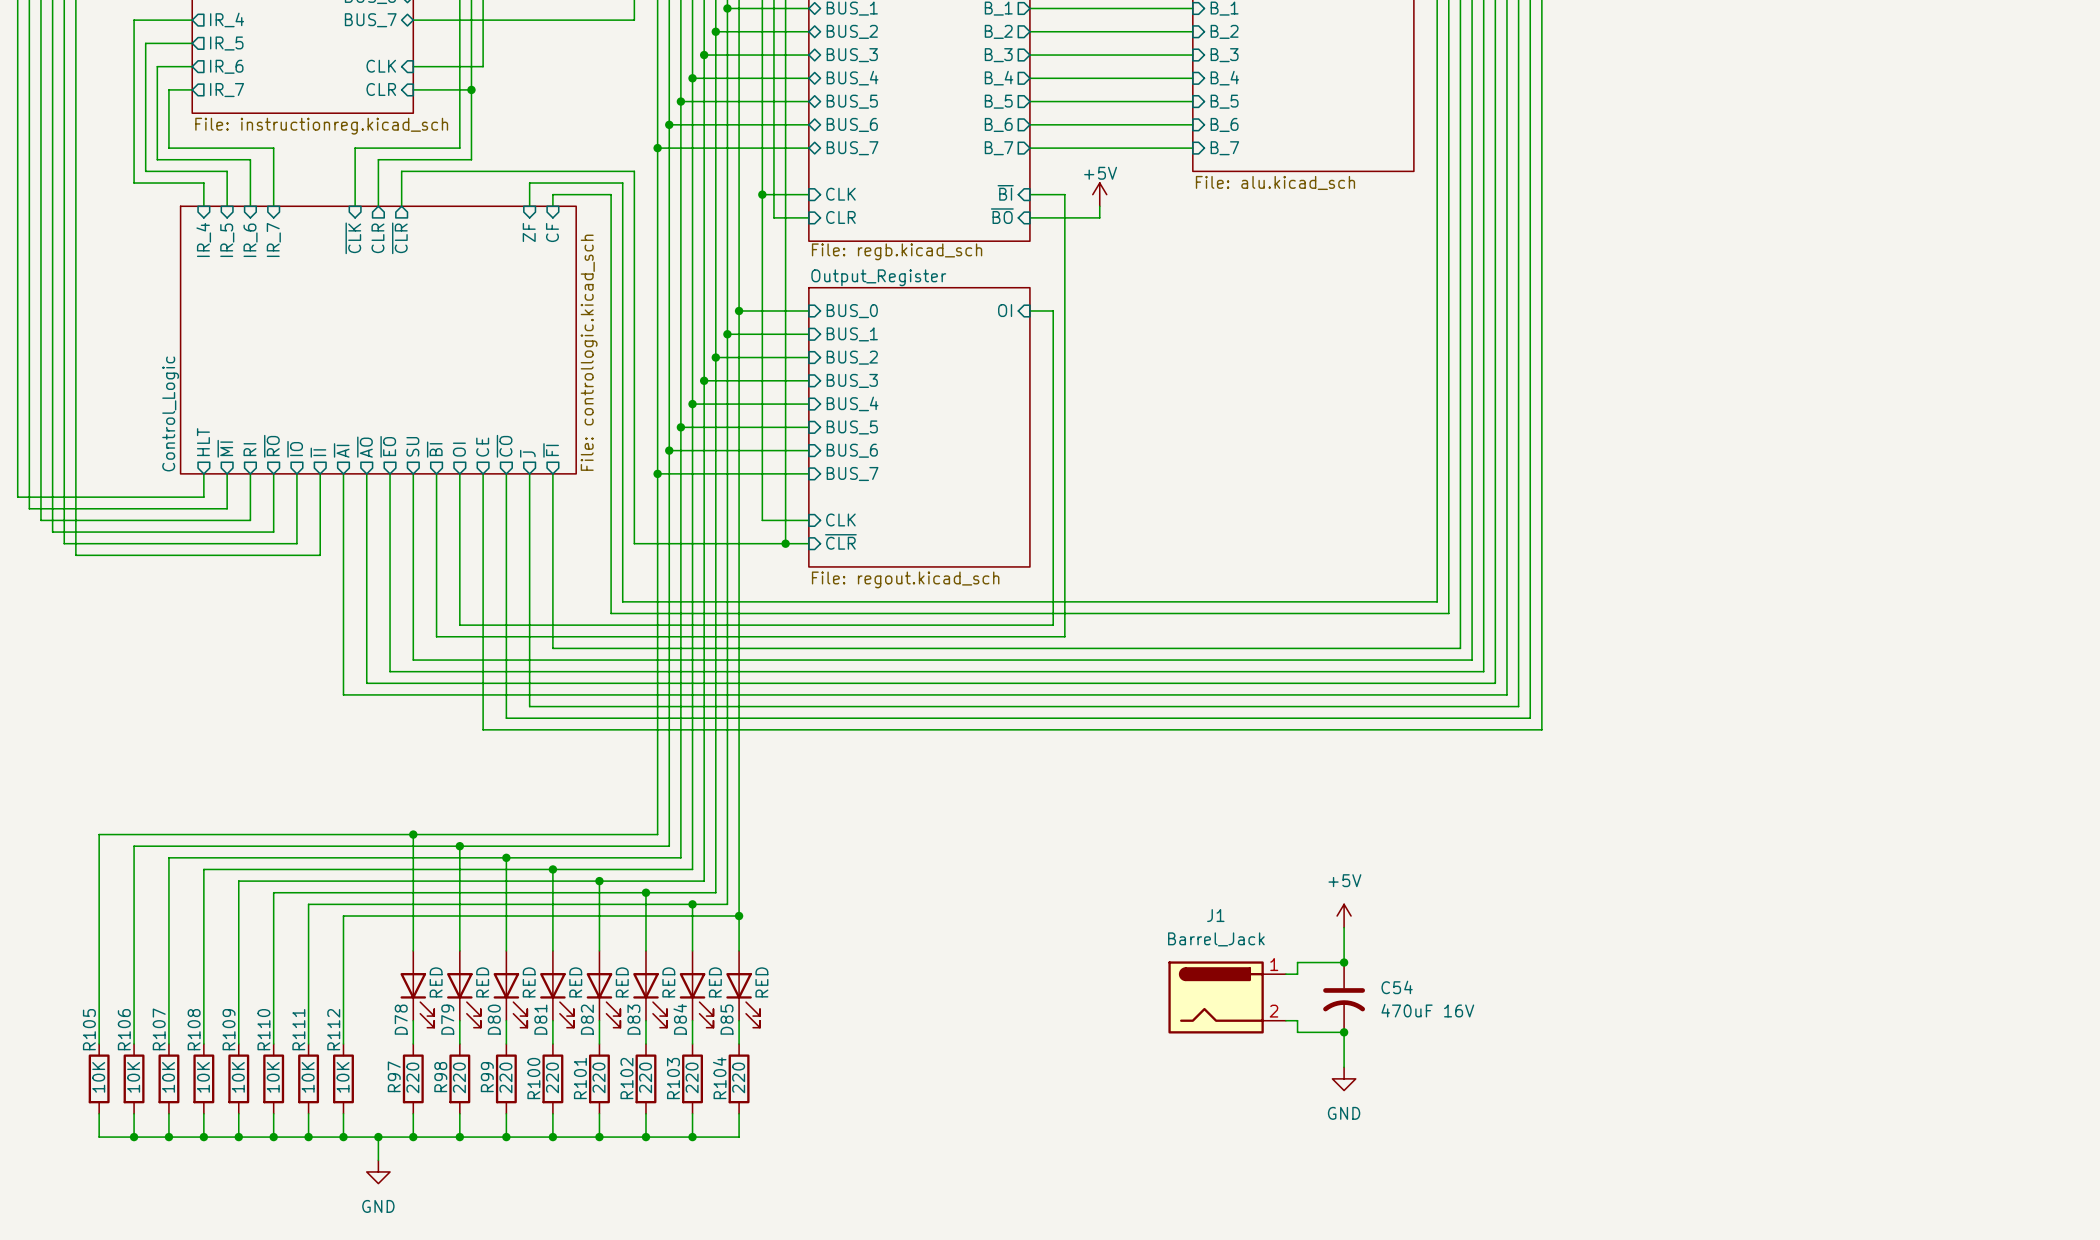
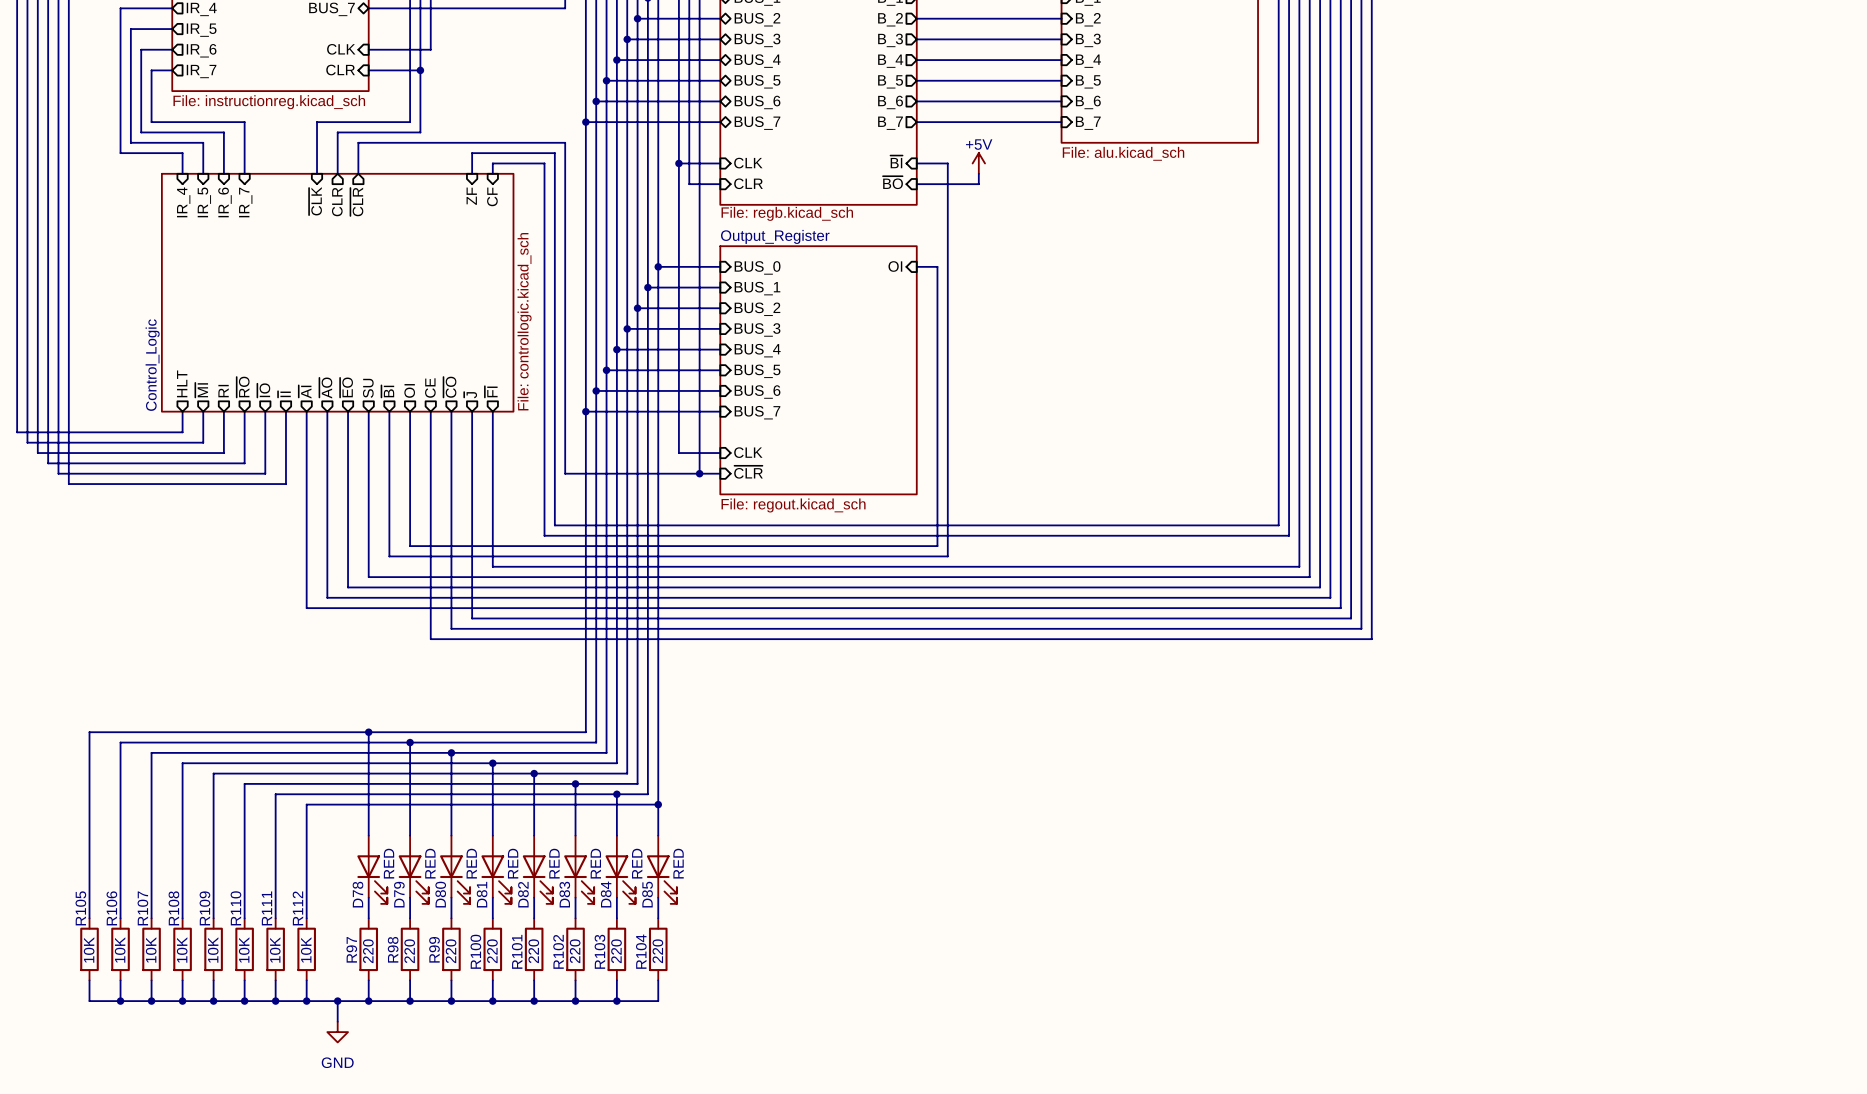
power symbol: +5V (1344, 916) -> none
wire: (1344, 927) (1344, 962) (1297, 962) (1297, 974) (1285, 974) -> none
junction: (1344, 962) -> none
J1: Barrel_Jack (1227, 997) -> none
C54: 470uF 16V (1344, 997) -> none
wire: (1285, 1020) (1297, 1020) (1297, 1032) (1344, 1032) (1344, 1067) -> none
junction: (1344, 1032) -> none
power symbol: GND (1344, 1078) -> none

